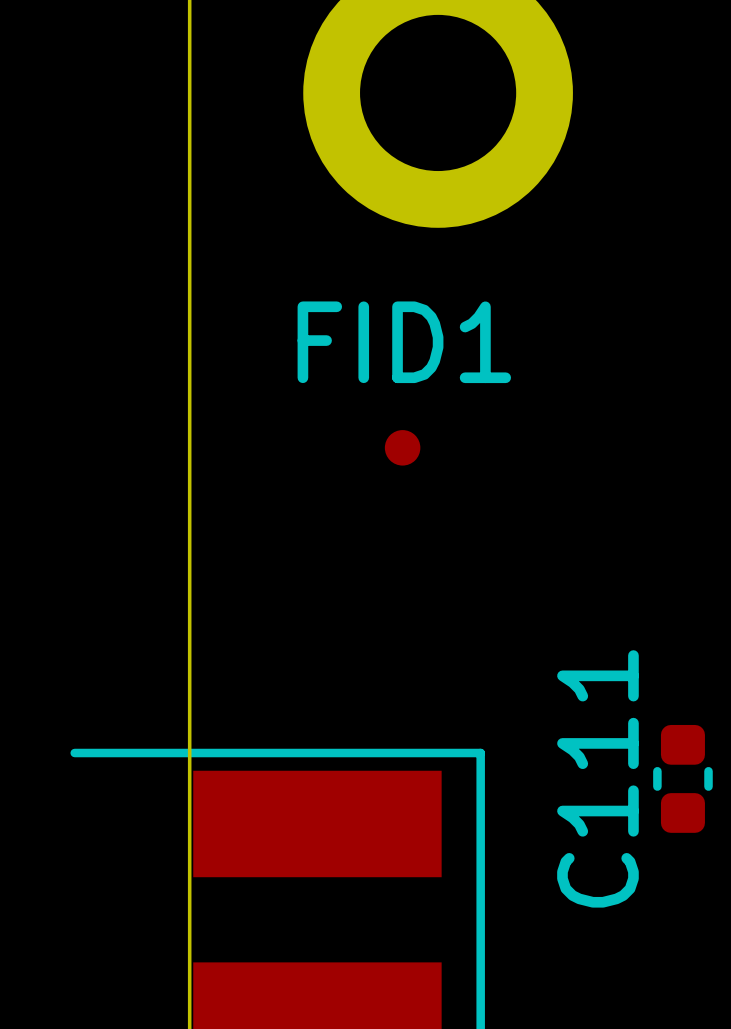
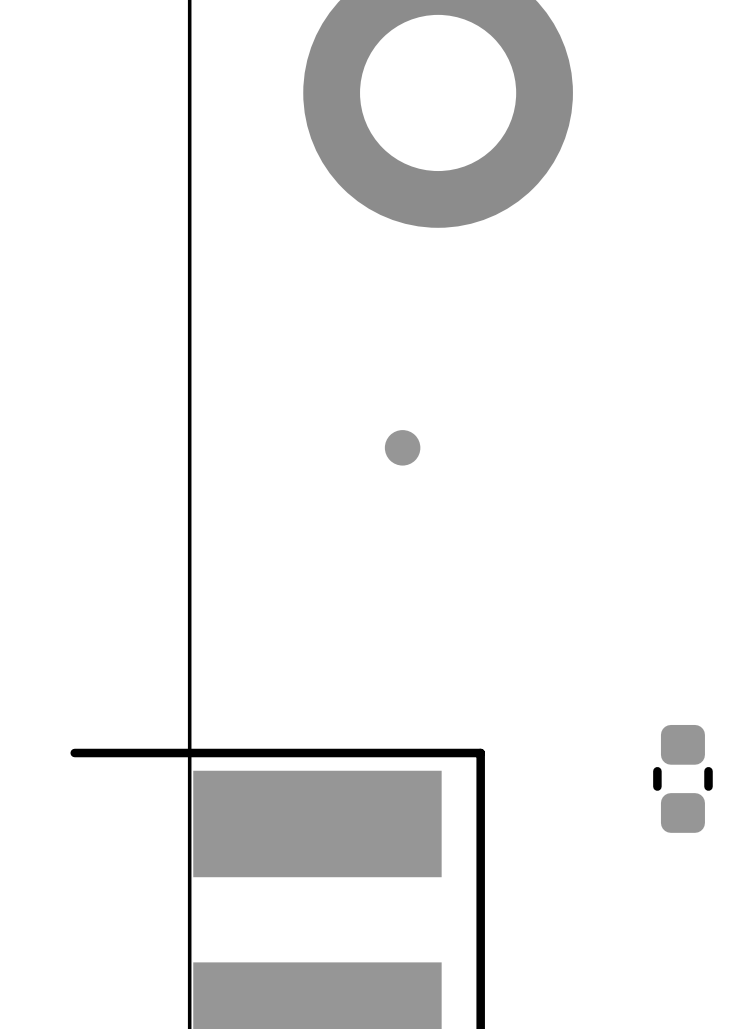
FID1 name: FID1 (404, 342) -> none
C111 name: C111 (597, 778) -> none

